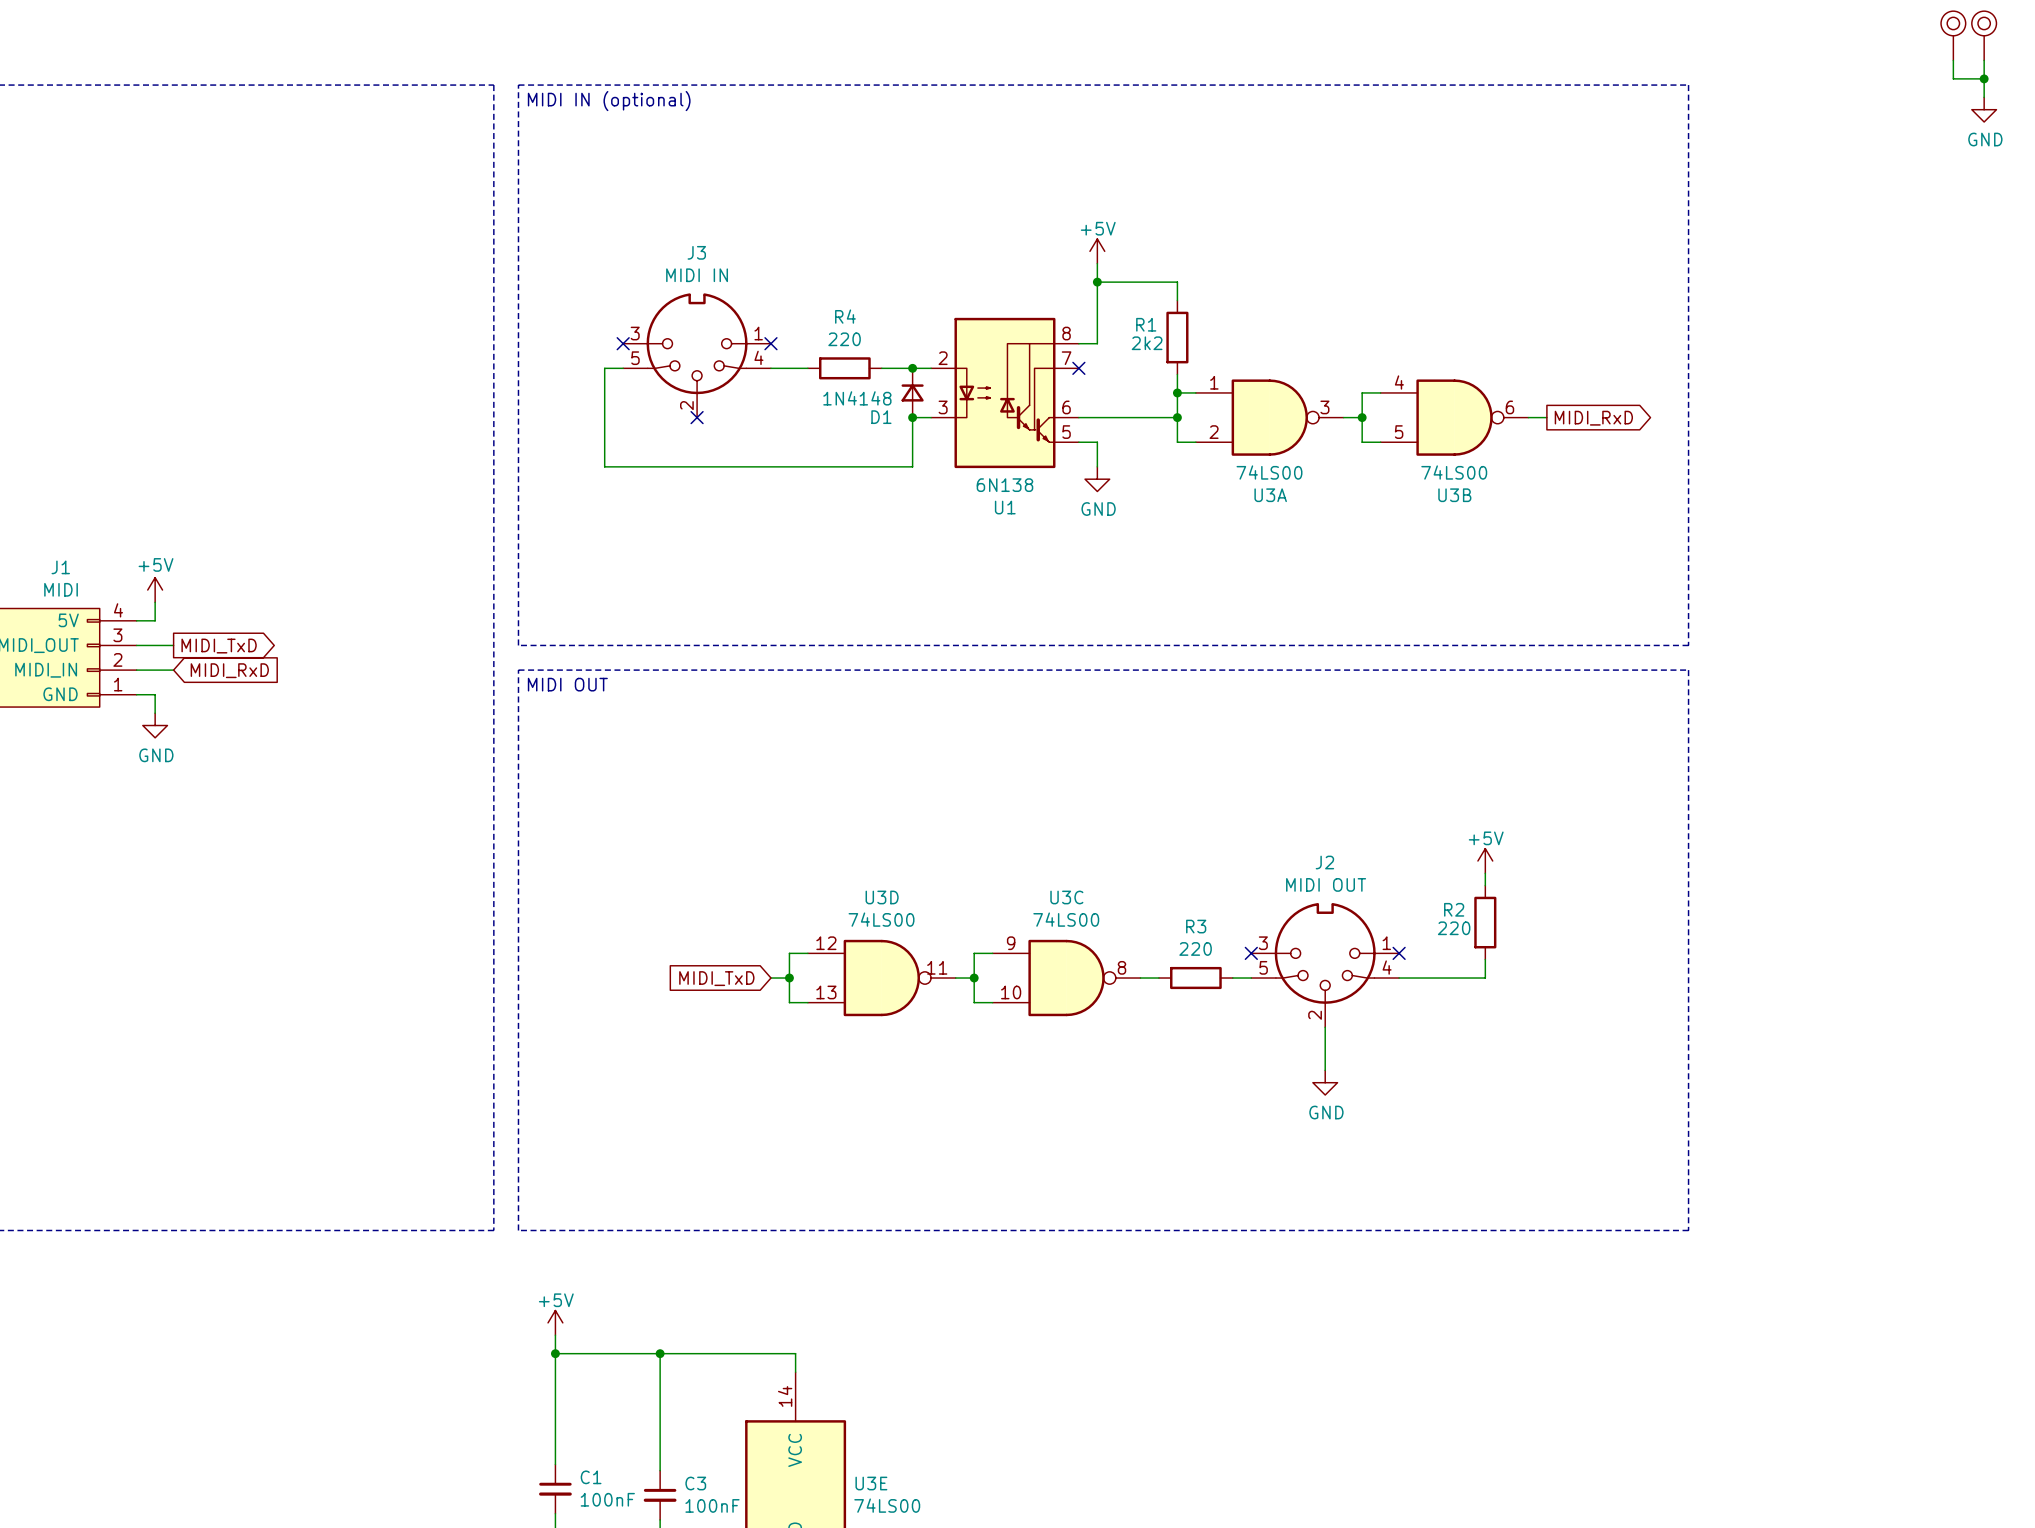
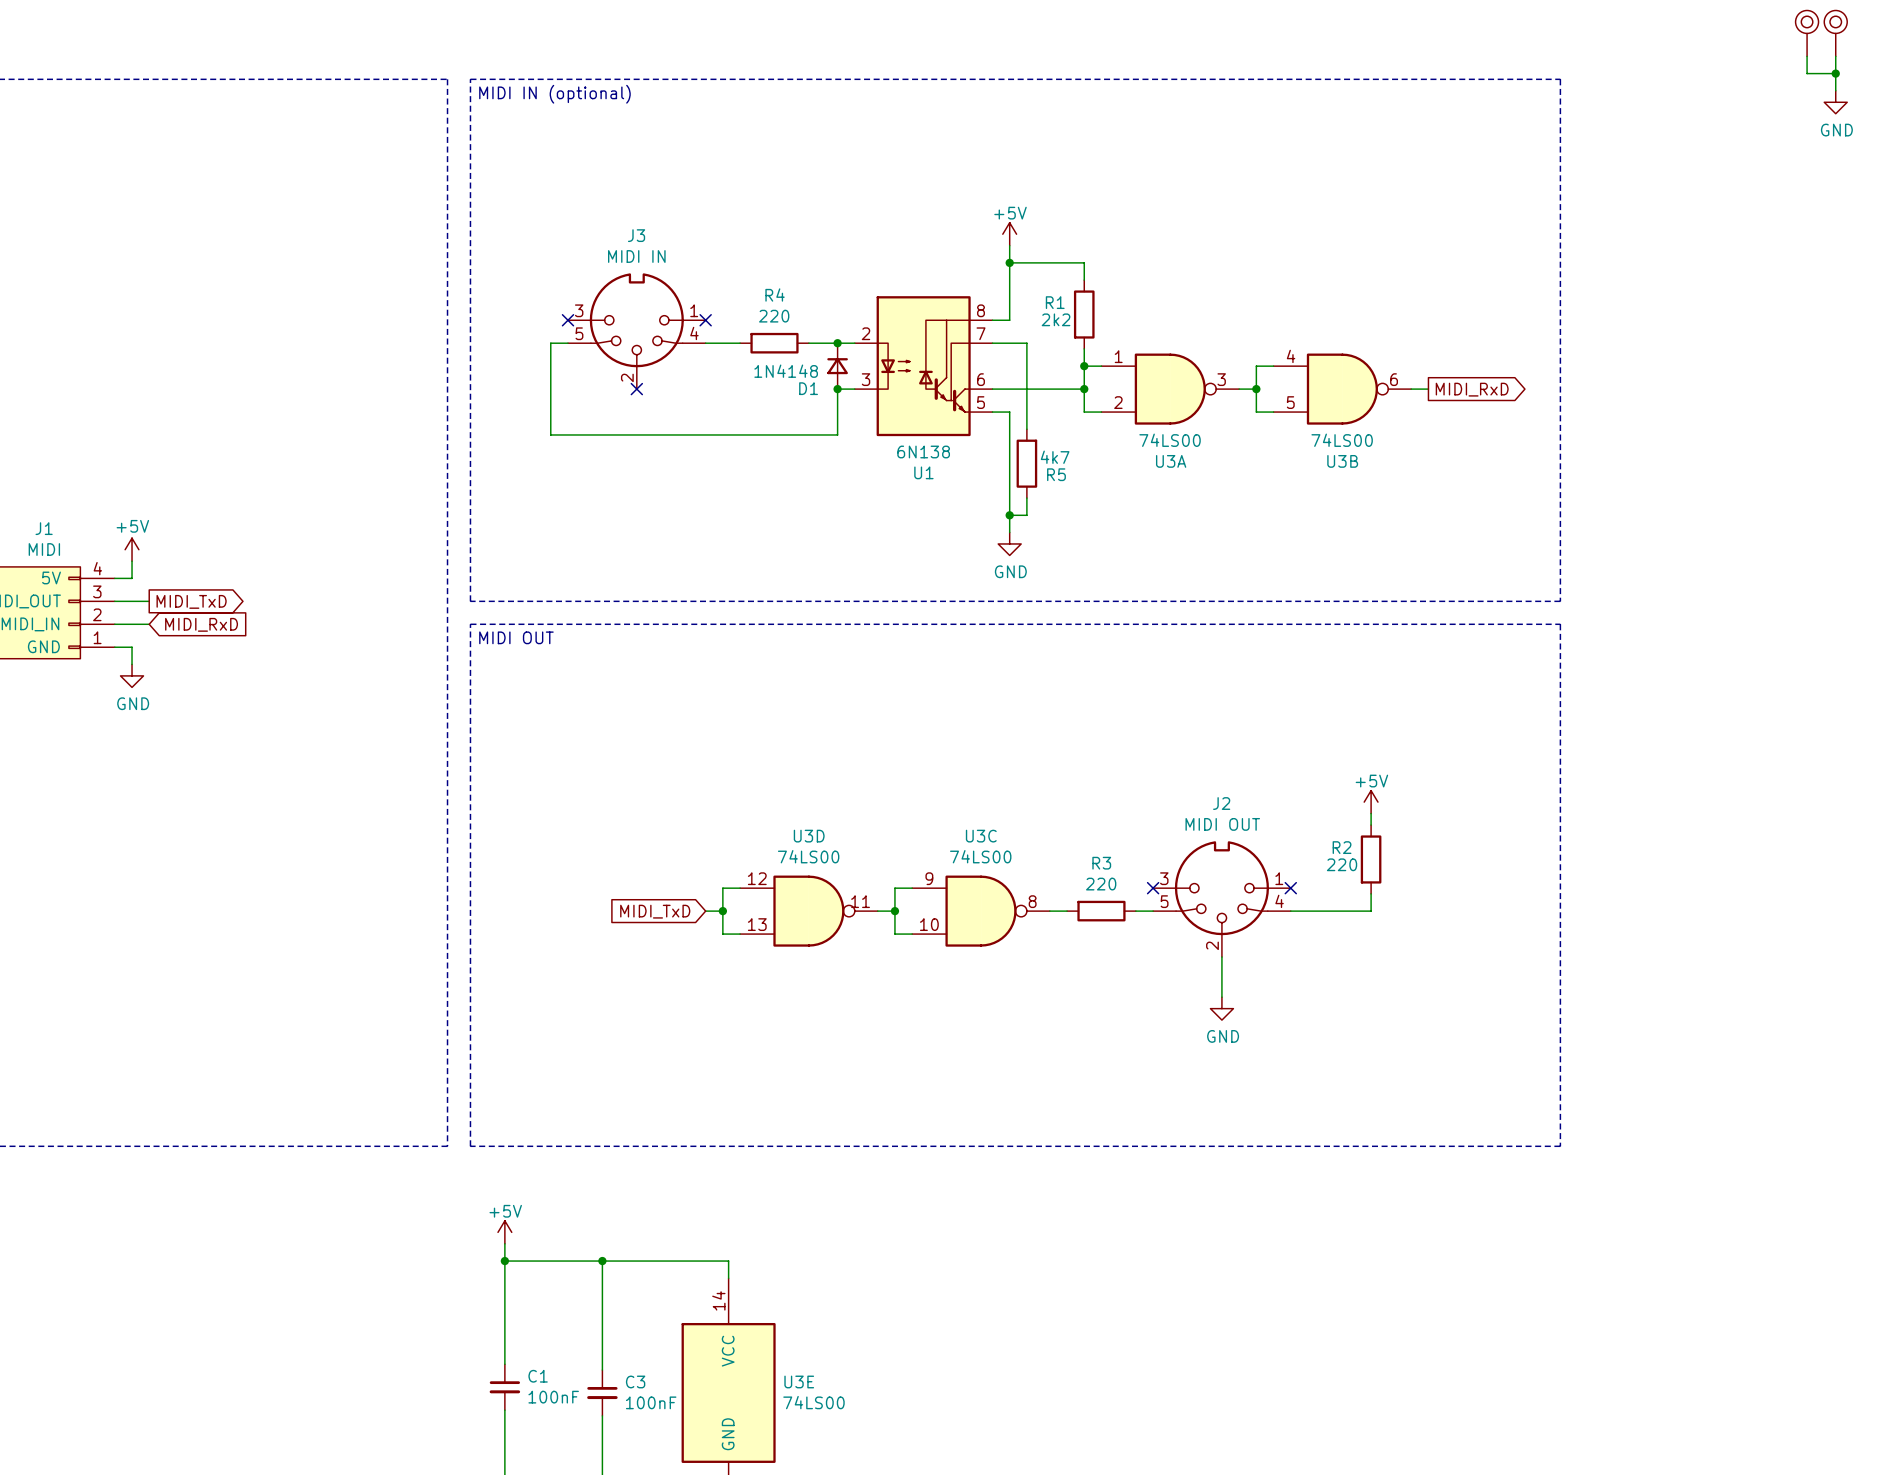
wire: none -> (992, 343) (1026, 343) (1026, 429)
no-connect mark: (1078, 368) -> none
wire: none -> (1009, 434) (1009, 532)
power symbol position: GND (1097, 479) -> GND (1009, 543)
R5: none -> 4k7 (1026, 463)
wire: none -> (1026, 498) (1026, 515) (1009, 515)
junction: none -> (1009, 515)

